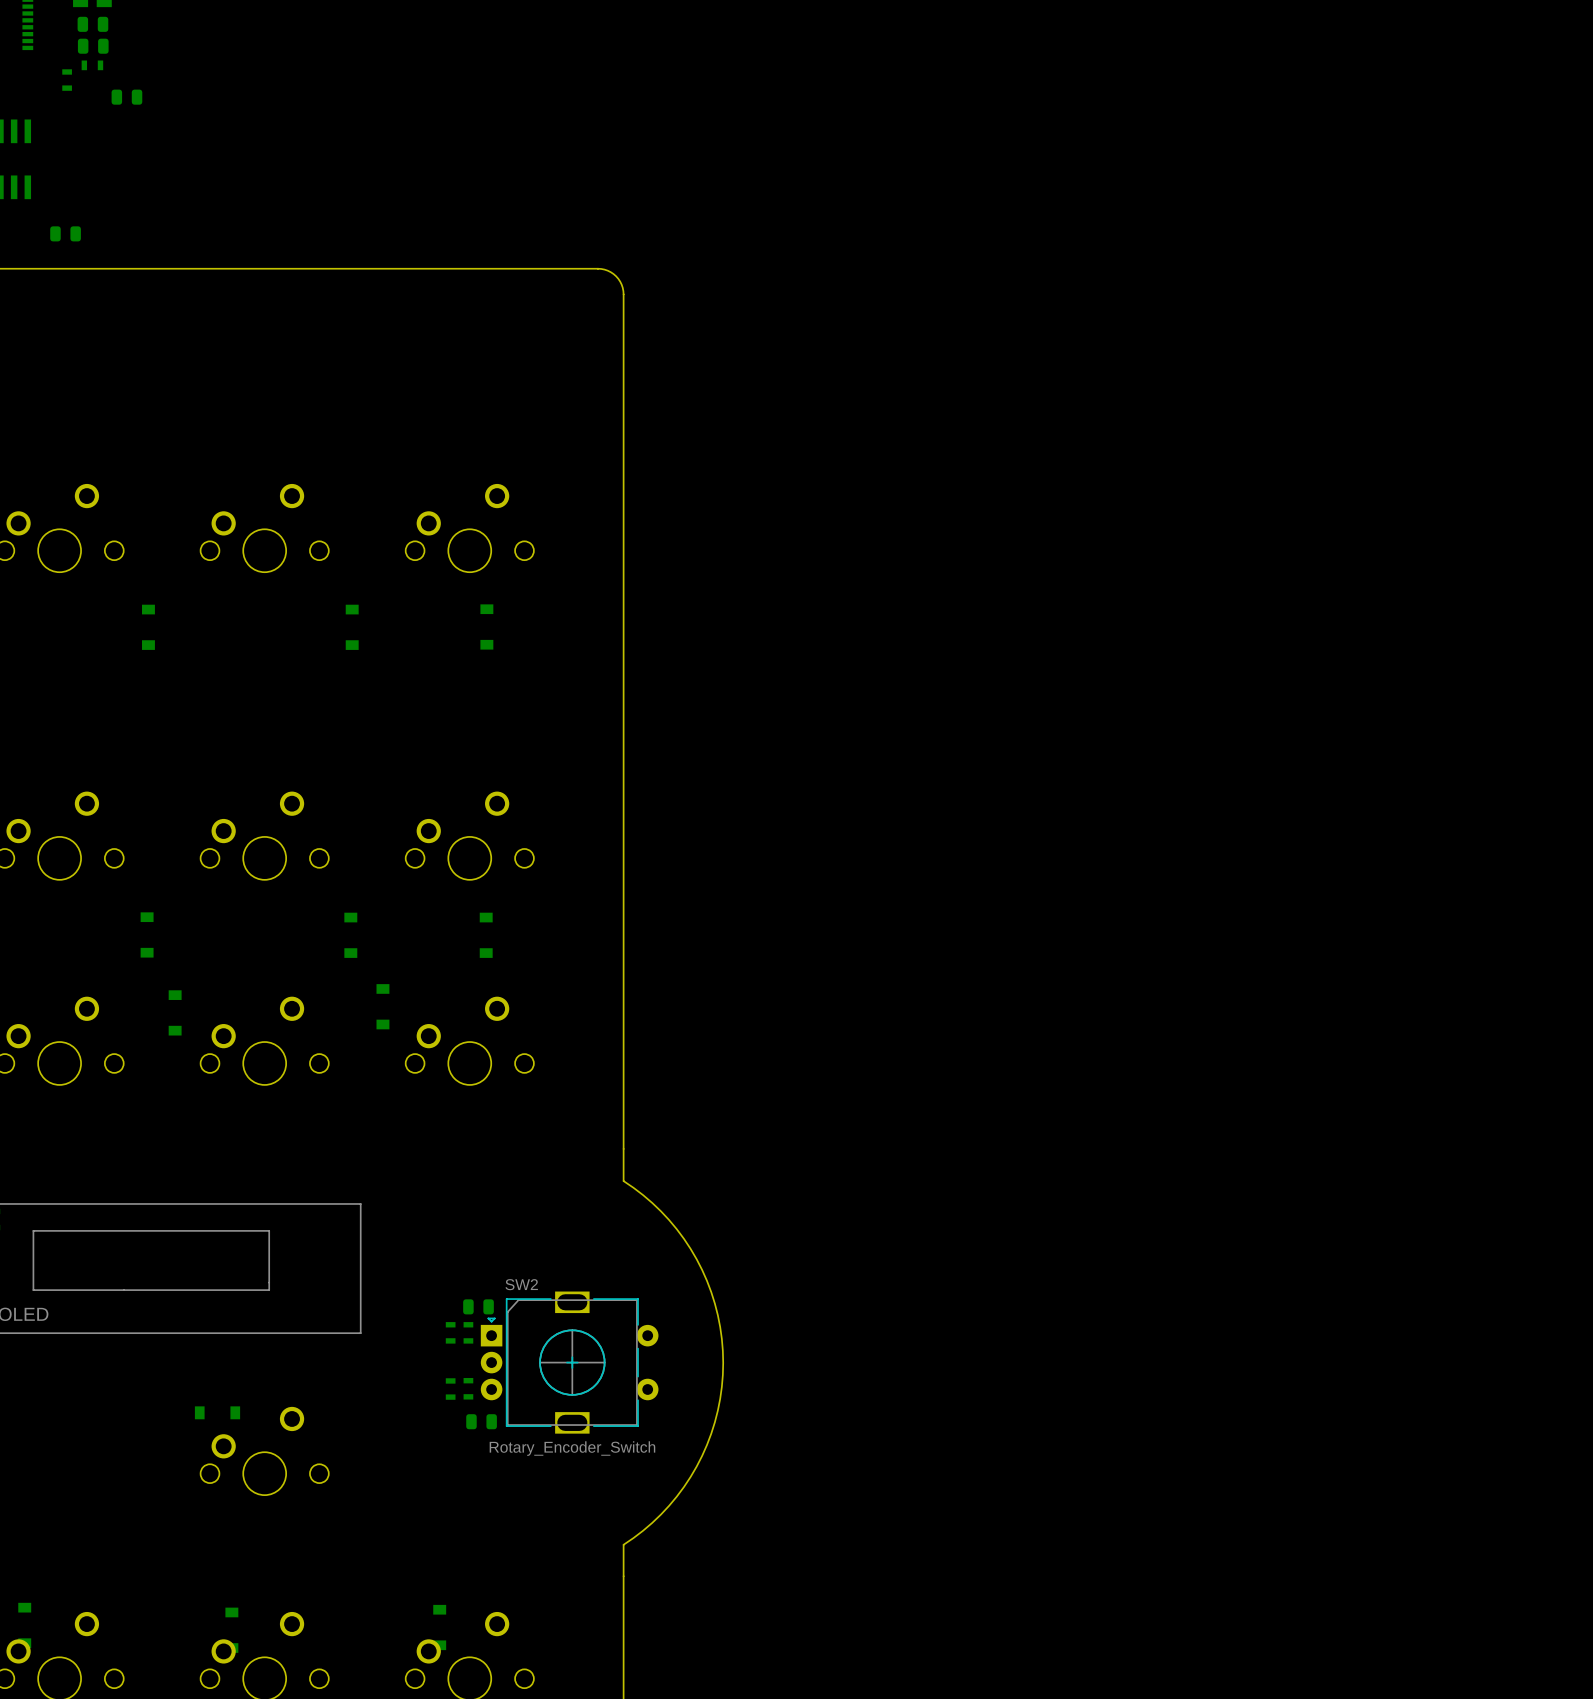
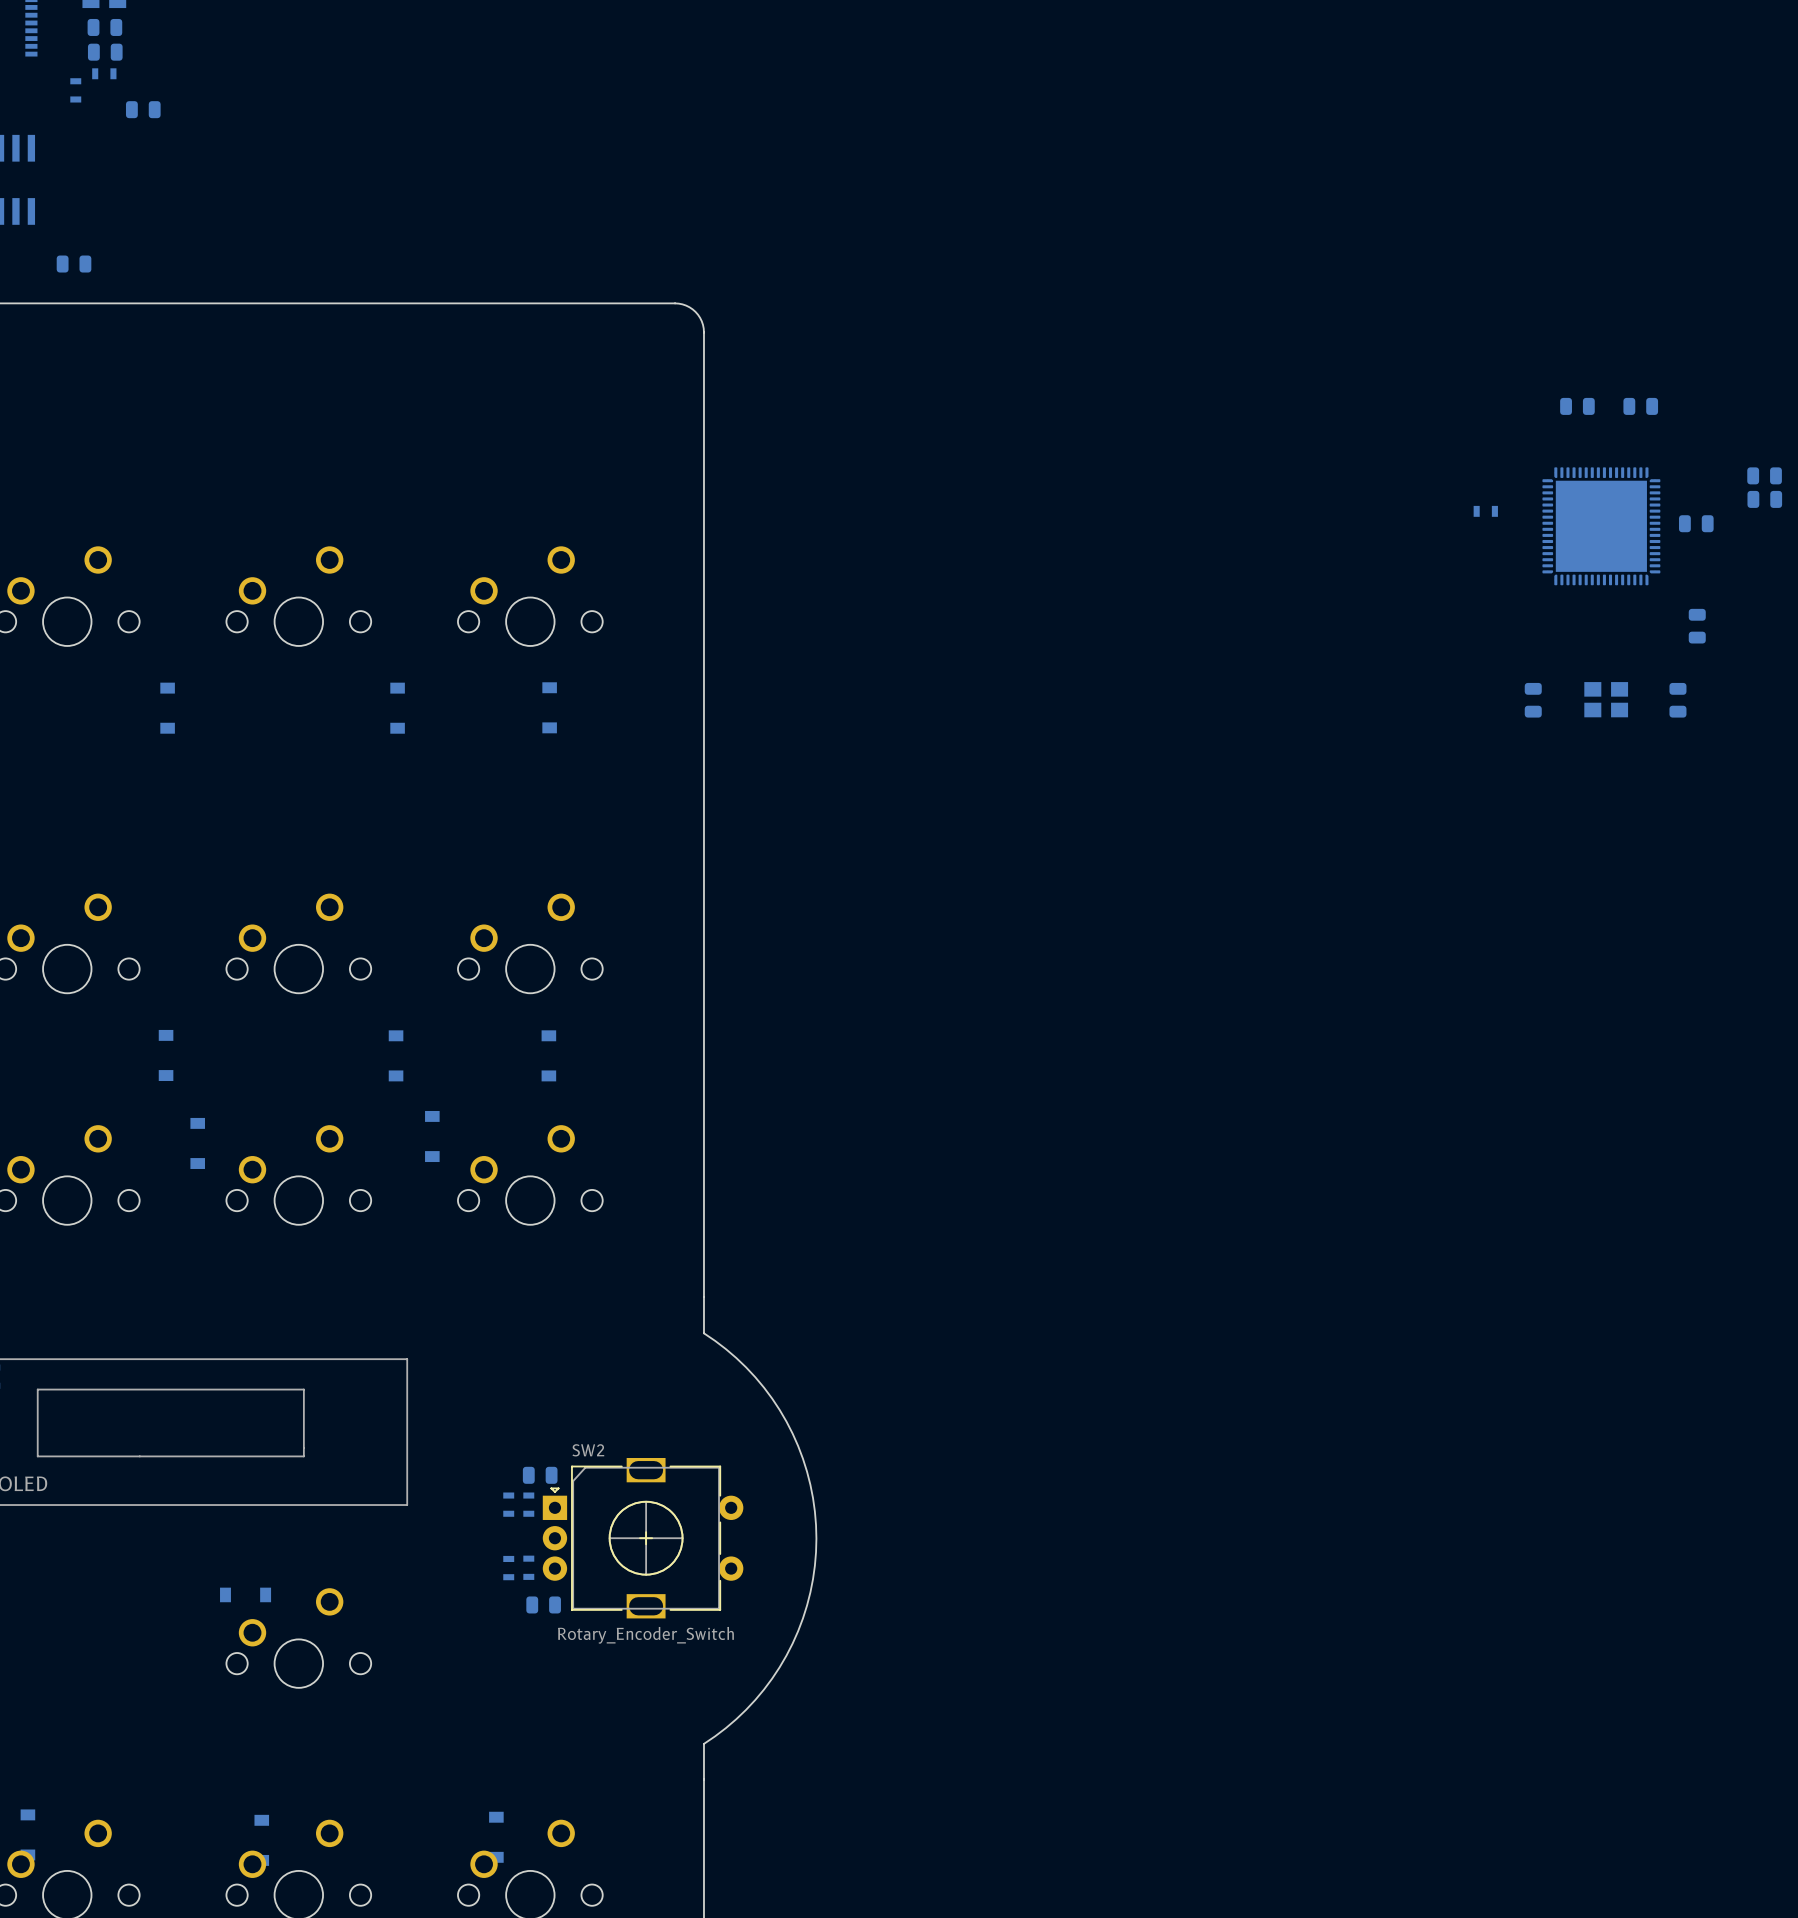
part: none -> (1577, 406)
part: none -> (1640, 406)
part: none -> (1764, 475)
part: none -> (1764, 499)
part: none -> (1485, 511)
part: none -> (1696, 523)
part: none -> (1601, 526)
part: none -> (1697, 626)
part: none -> (1606, 699)
part: none -> (1533, 700)
part: none -> (1677, 700)

